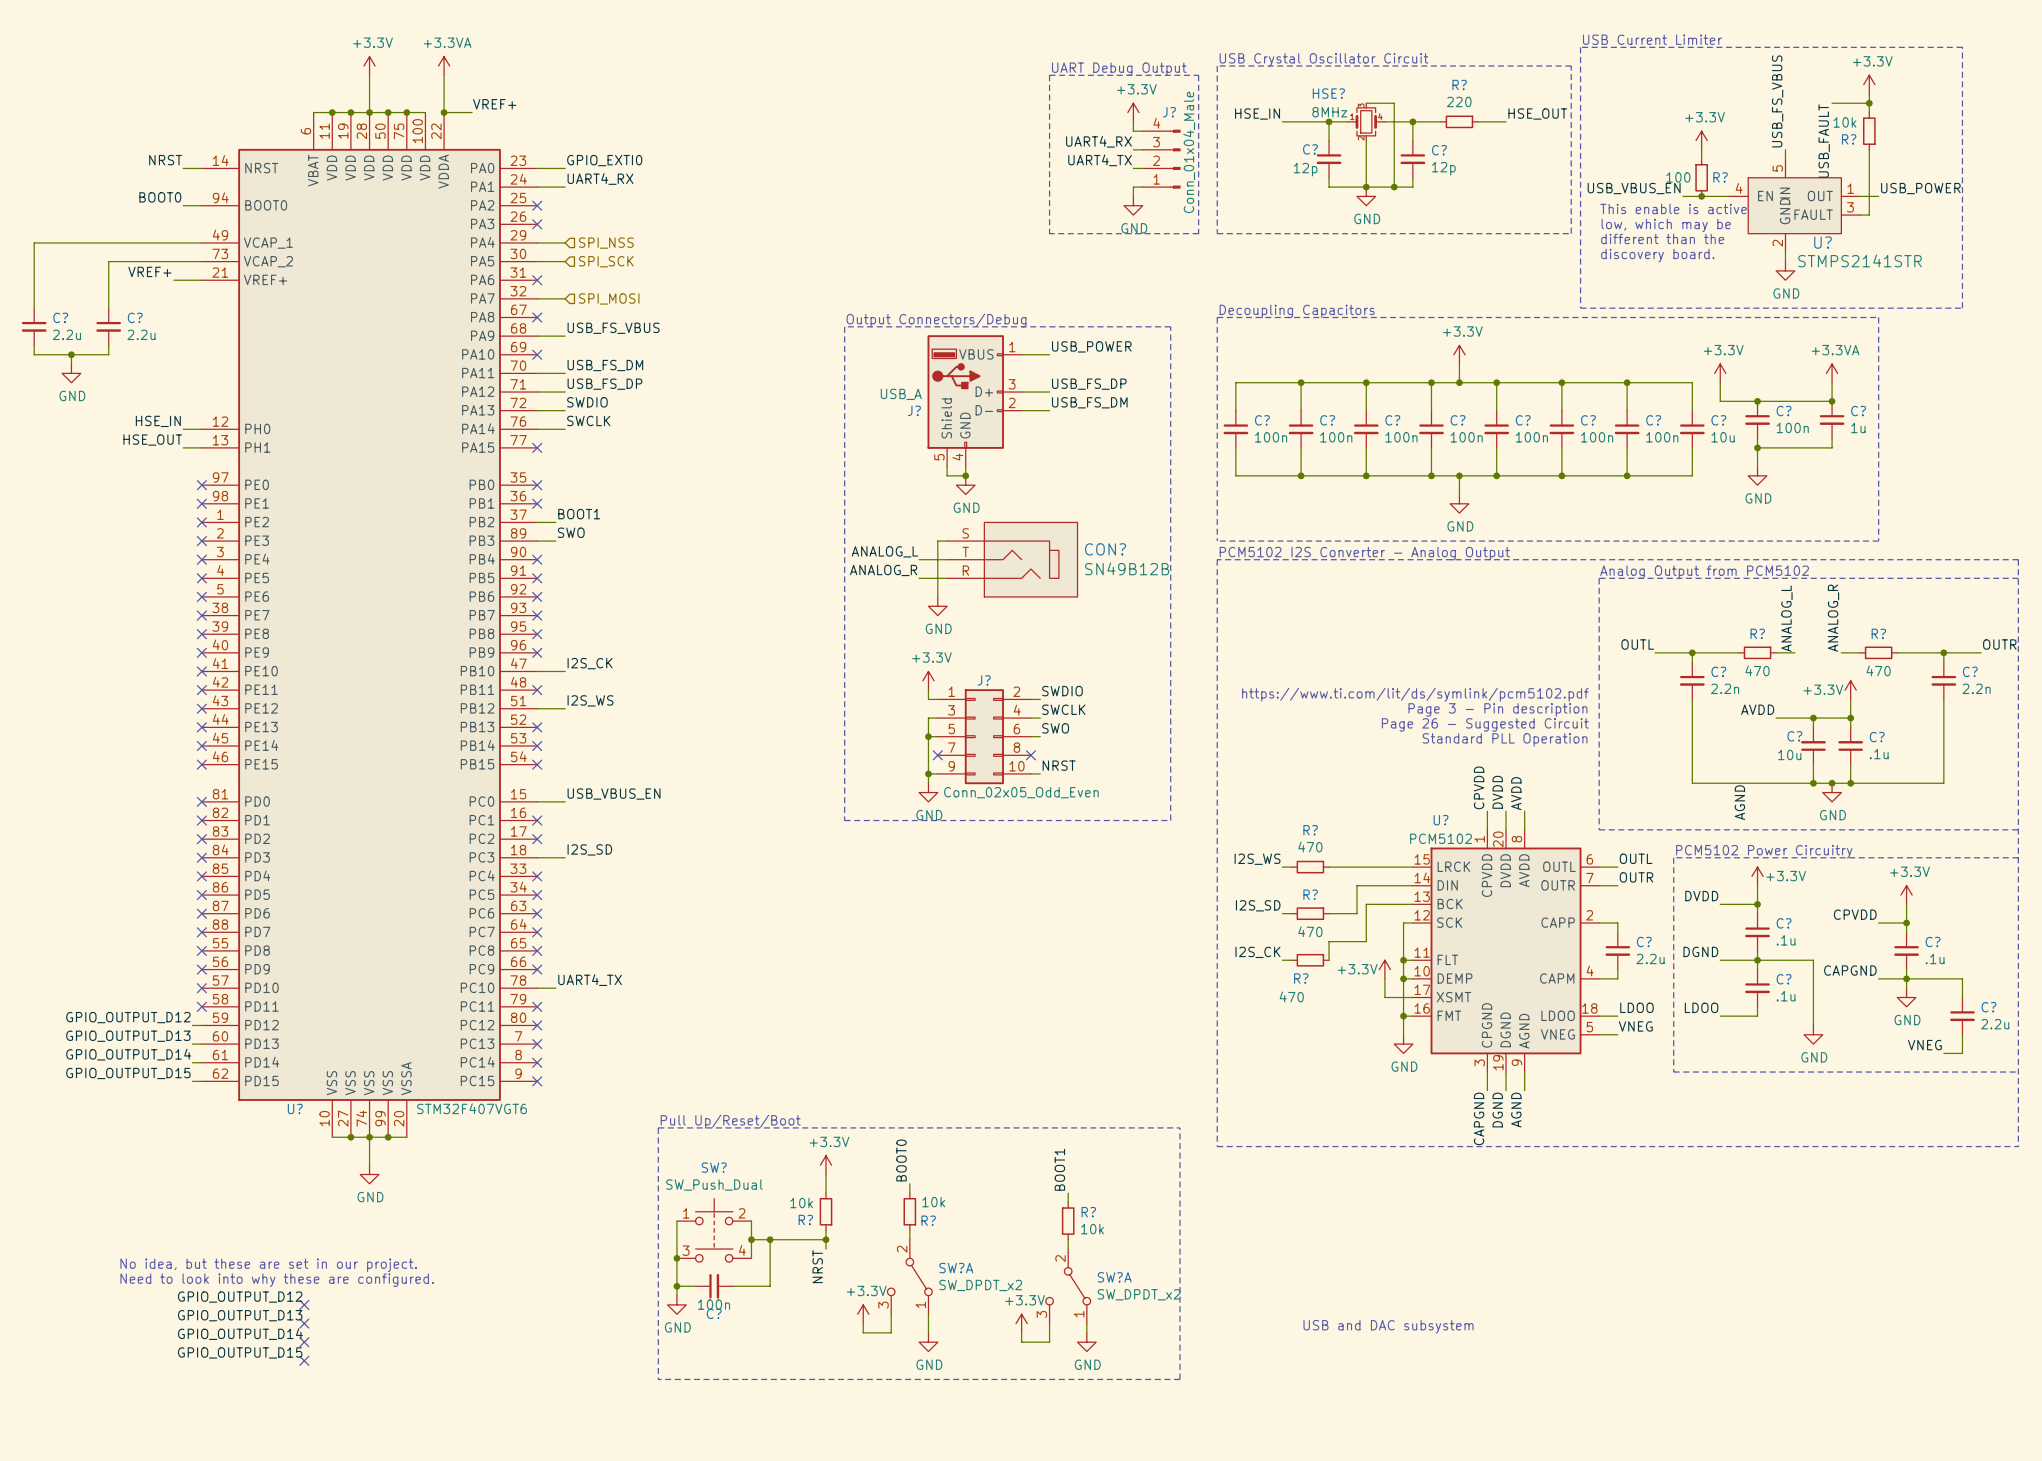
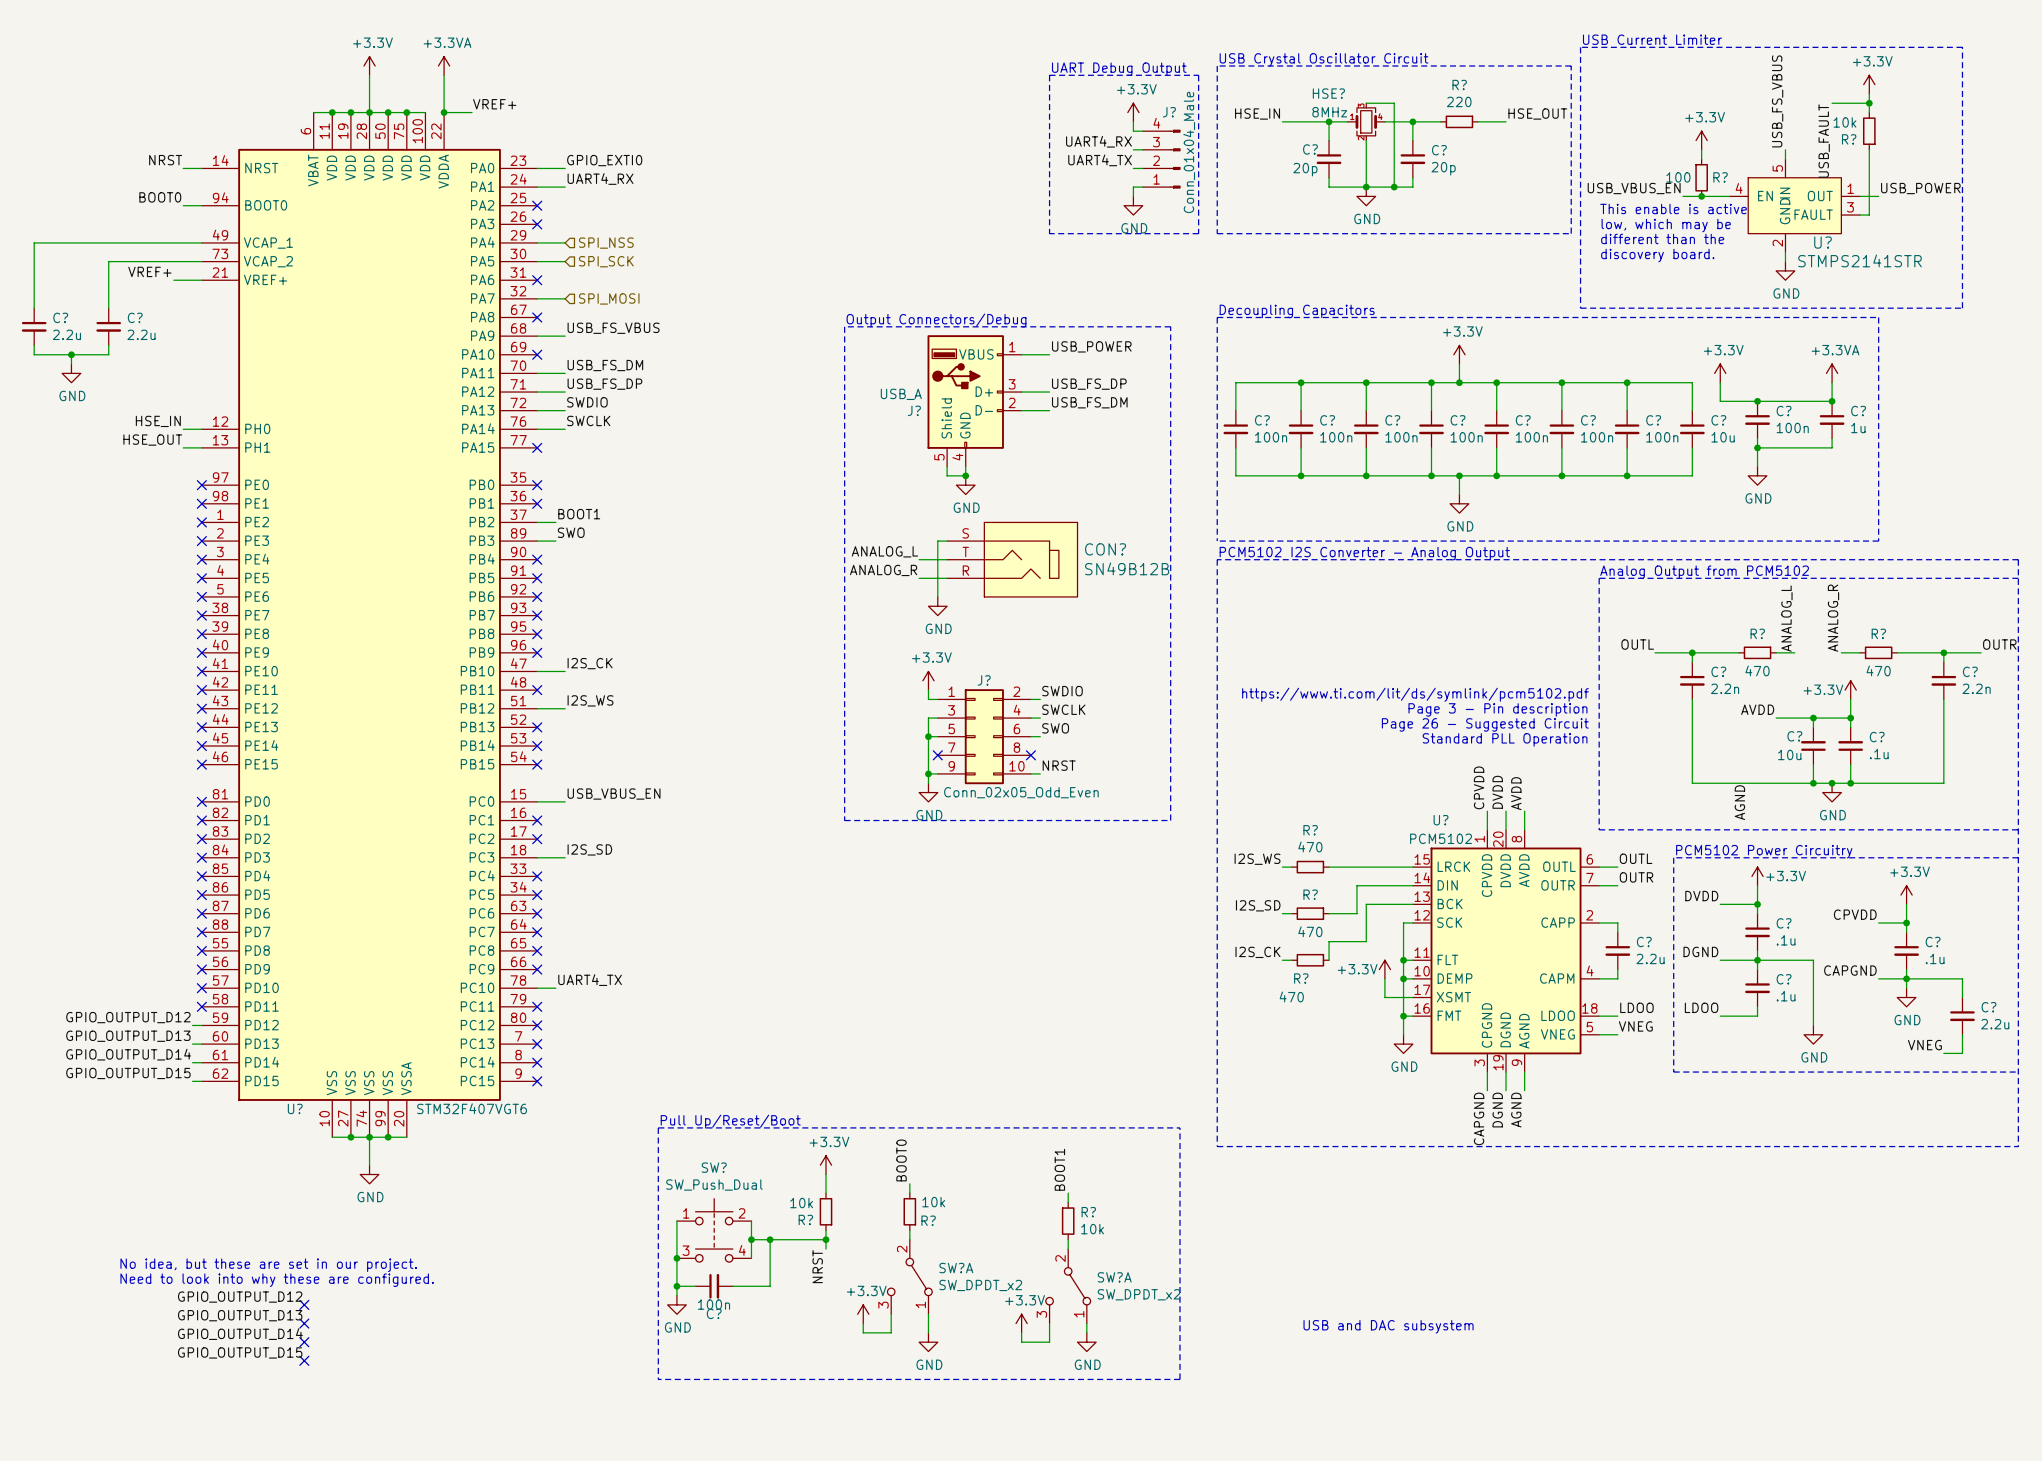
C? value: 12p (1443, 168) -> 20p (1443, 168)
C? value: 12p (1305, 169) -> 20p (1305, 169)

